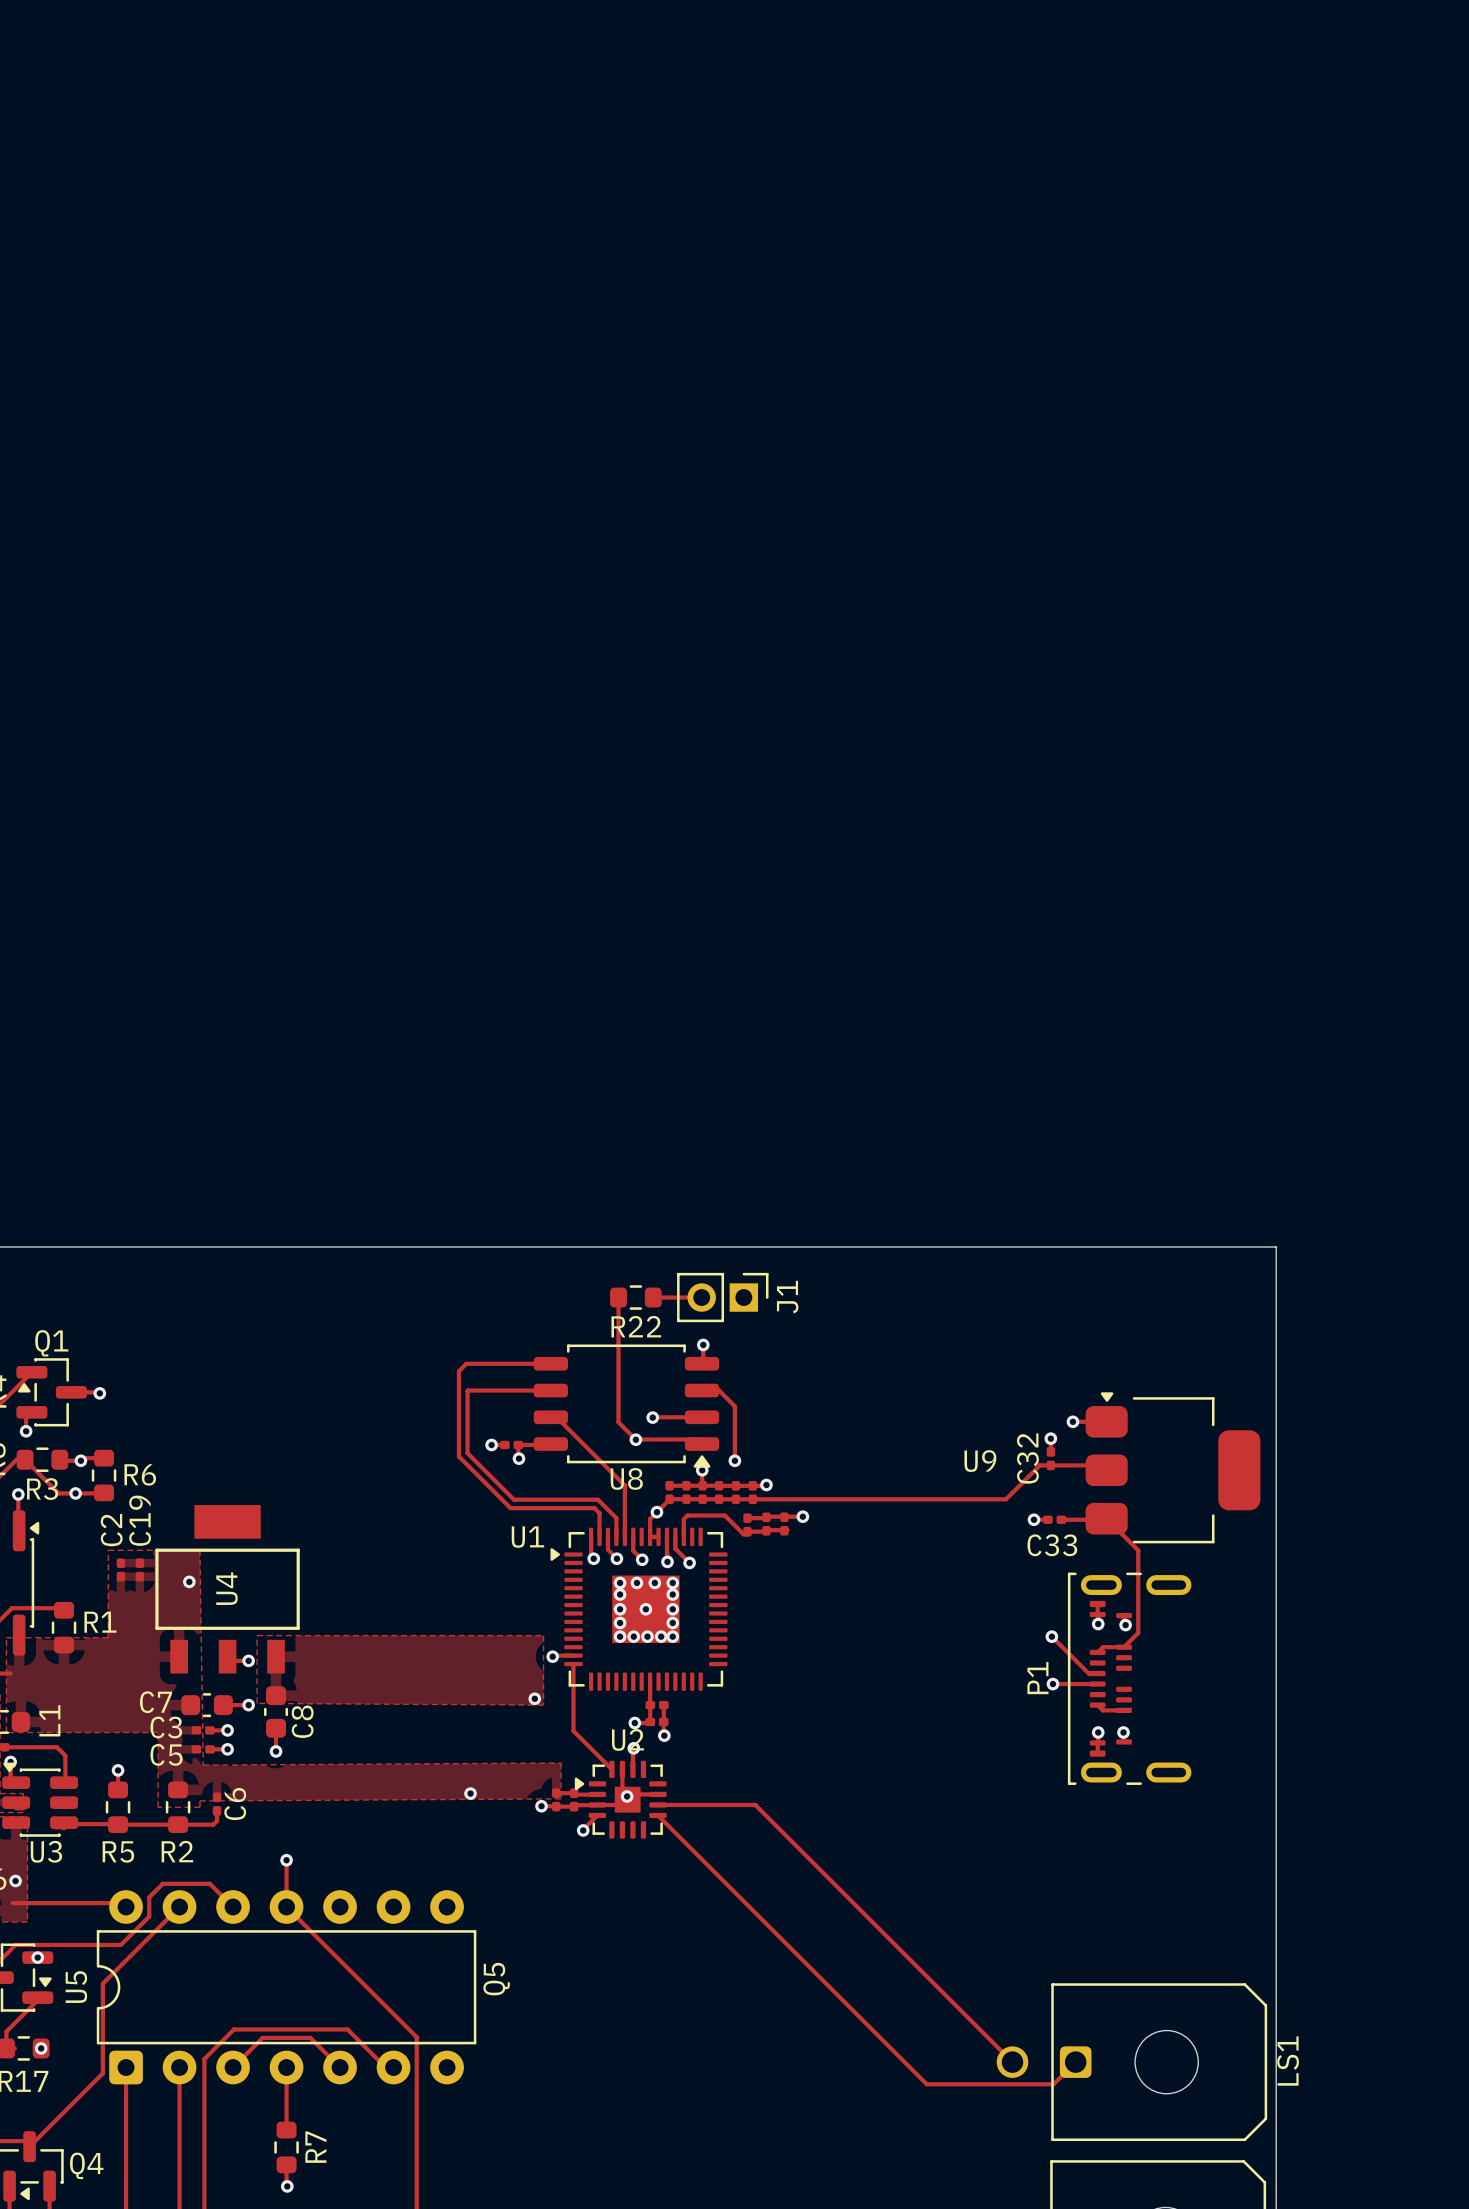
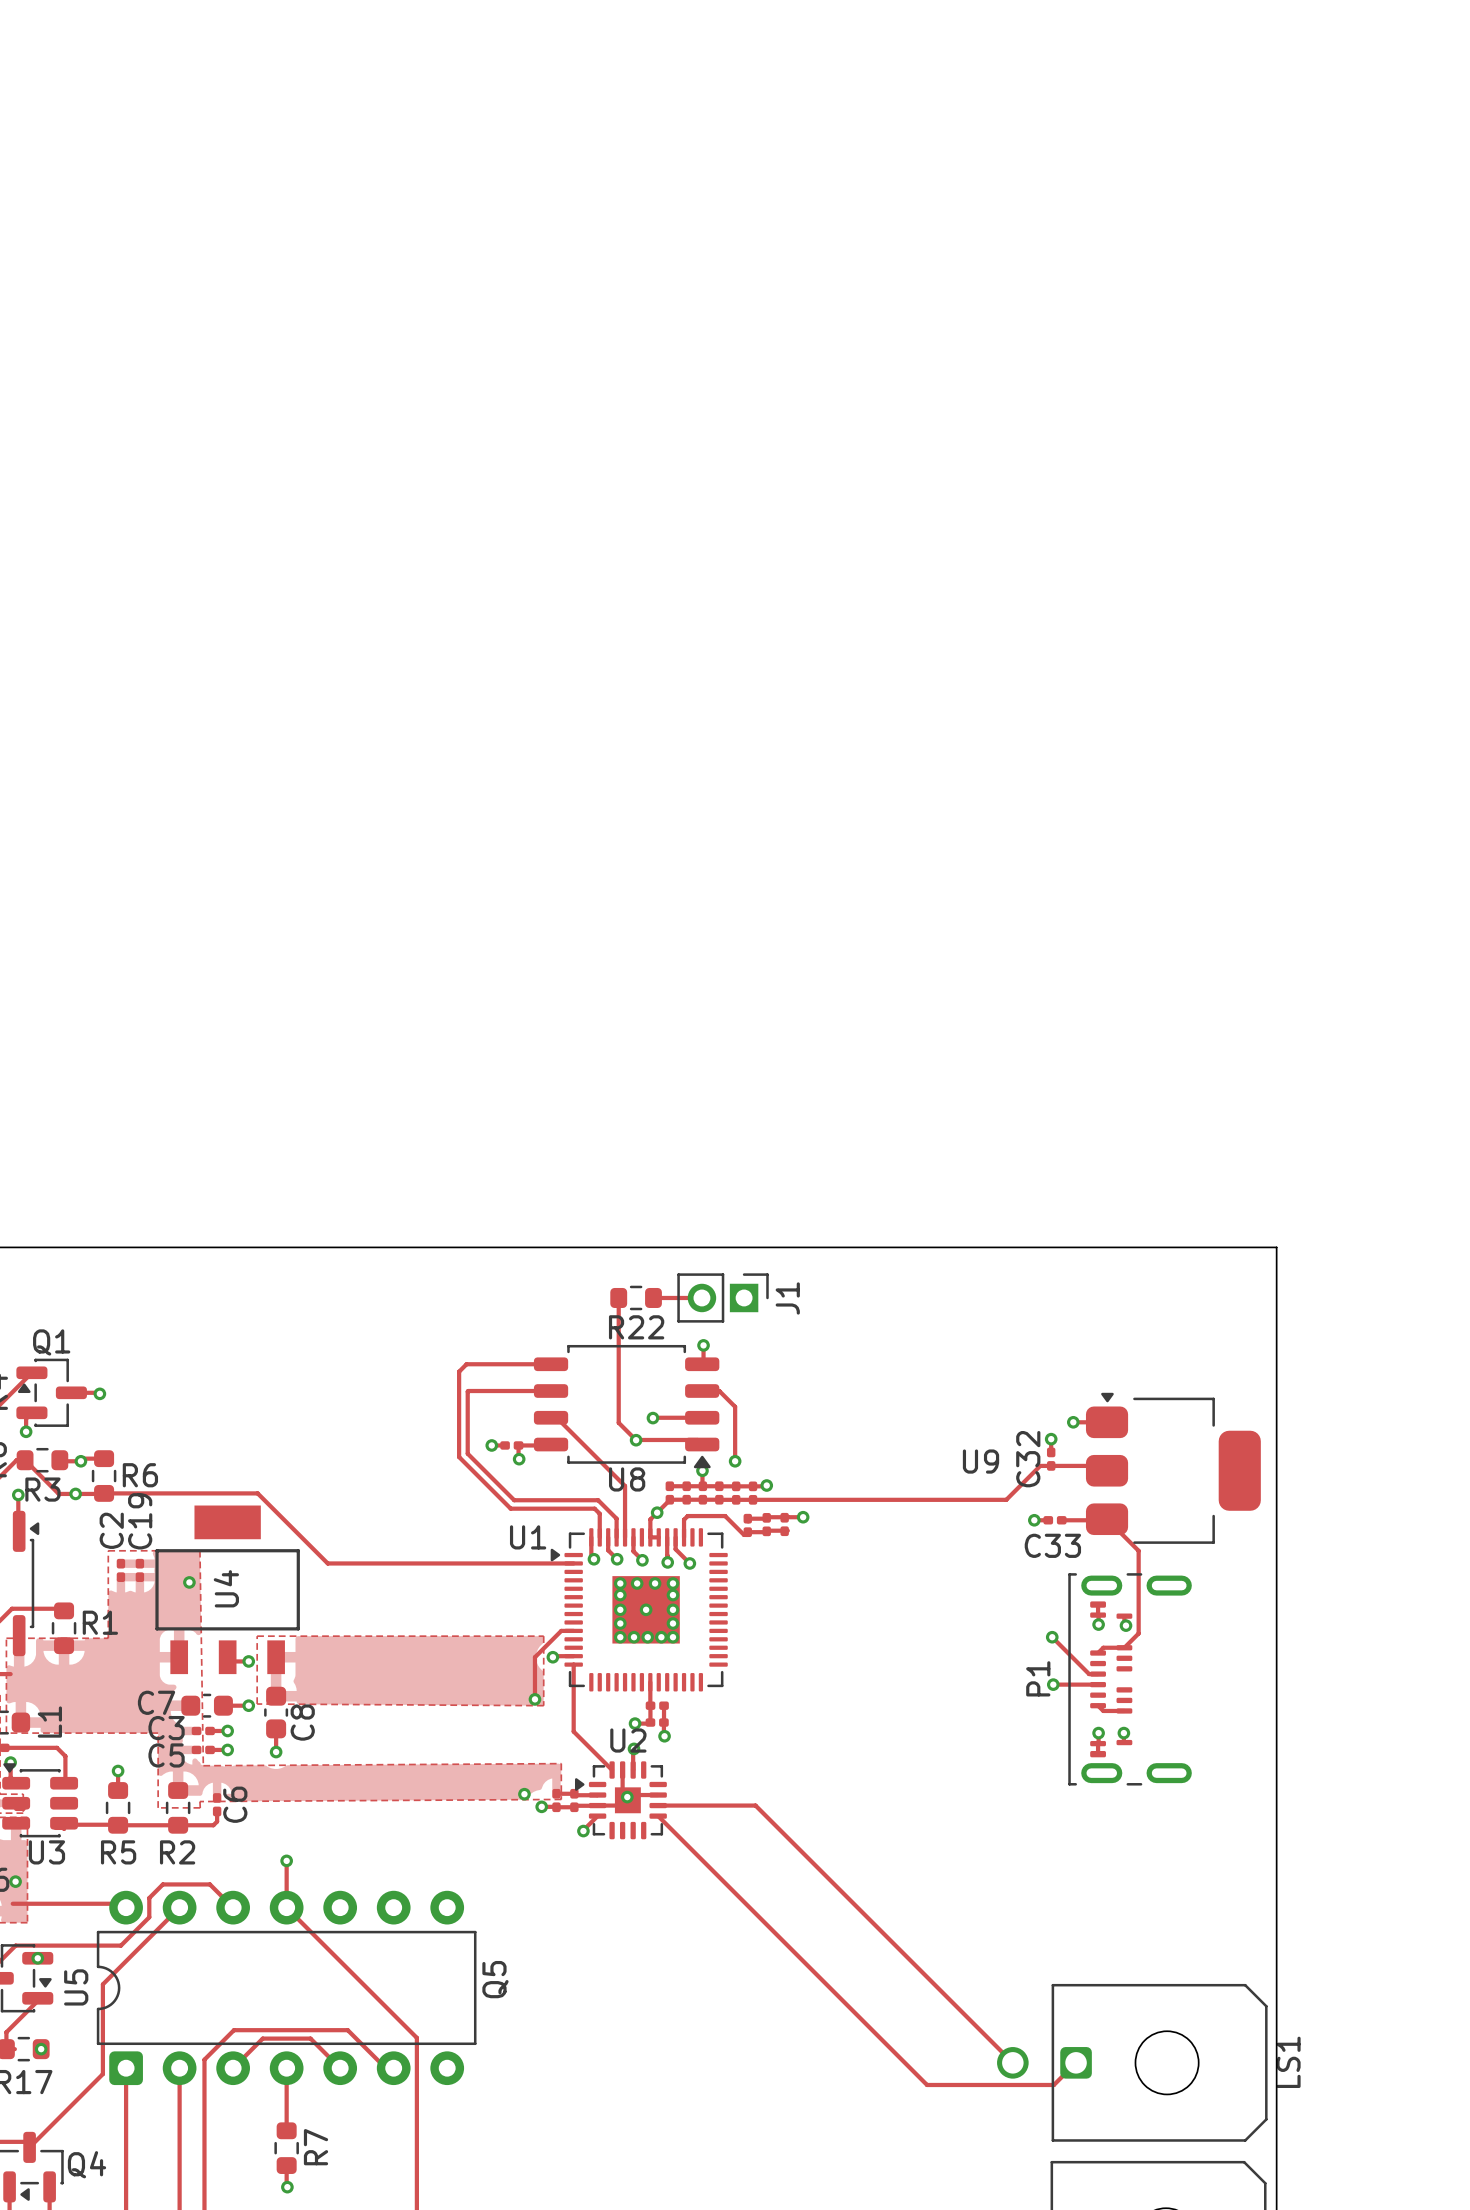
track: none -> (104, 1493) (257, 1493) (327, 1563) (573, 1563)
track: none -> (573, 1630) (561, 1630) (534, 1657) (534, 1699)
via position: (470, 1793) -> (524, 1794)

